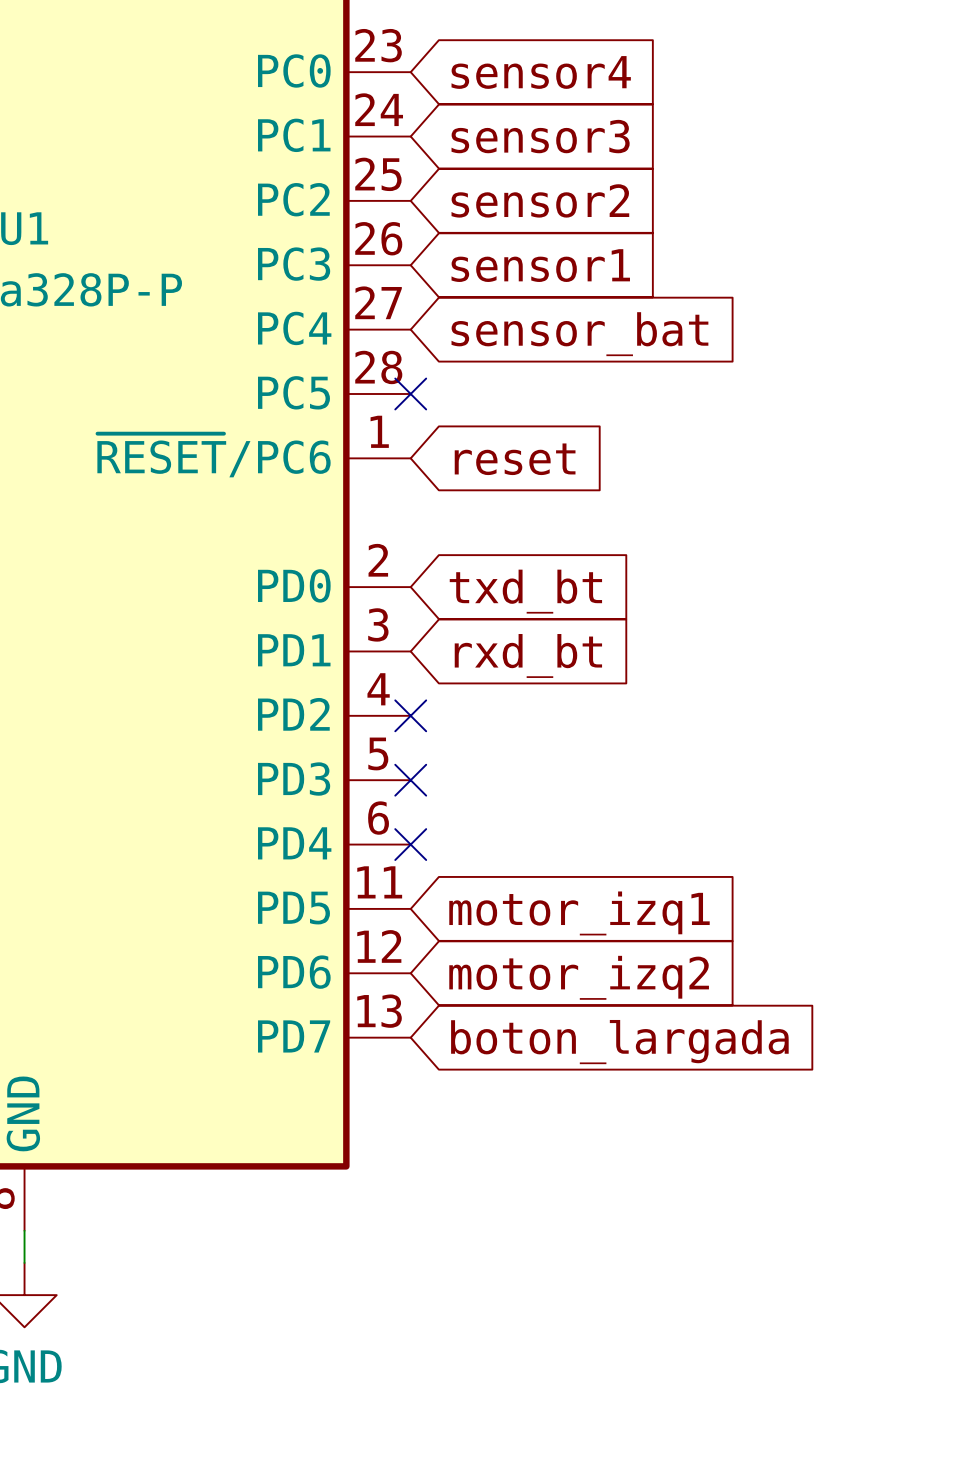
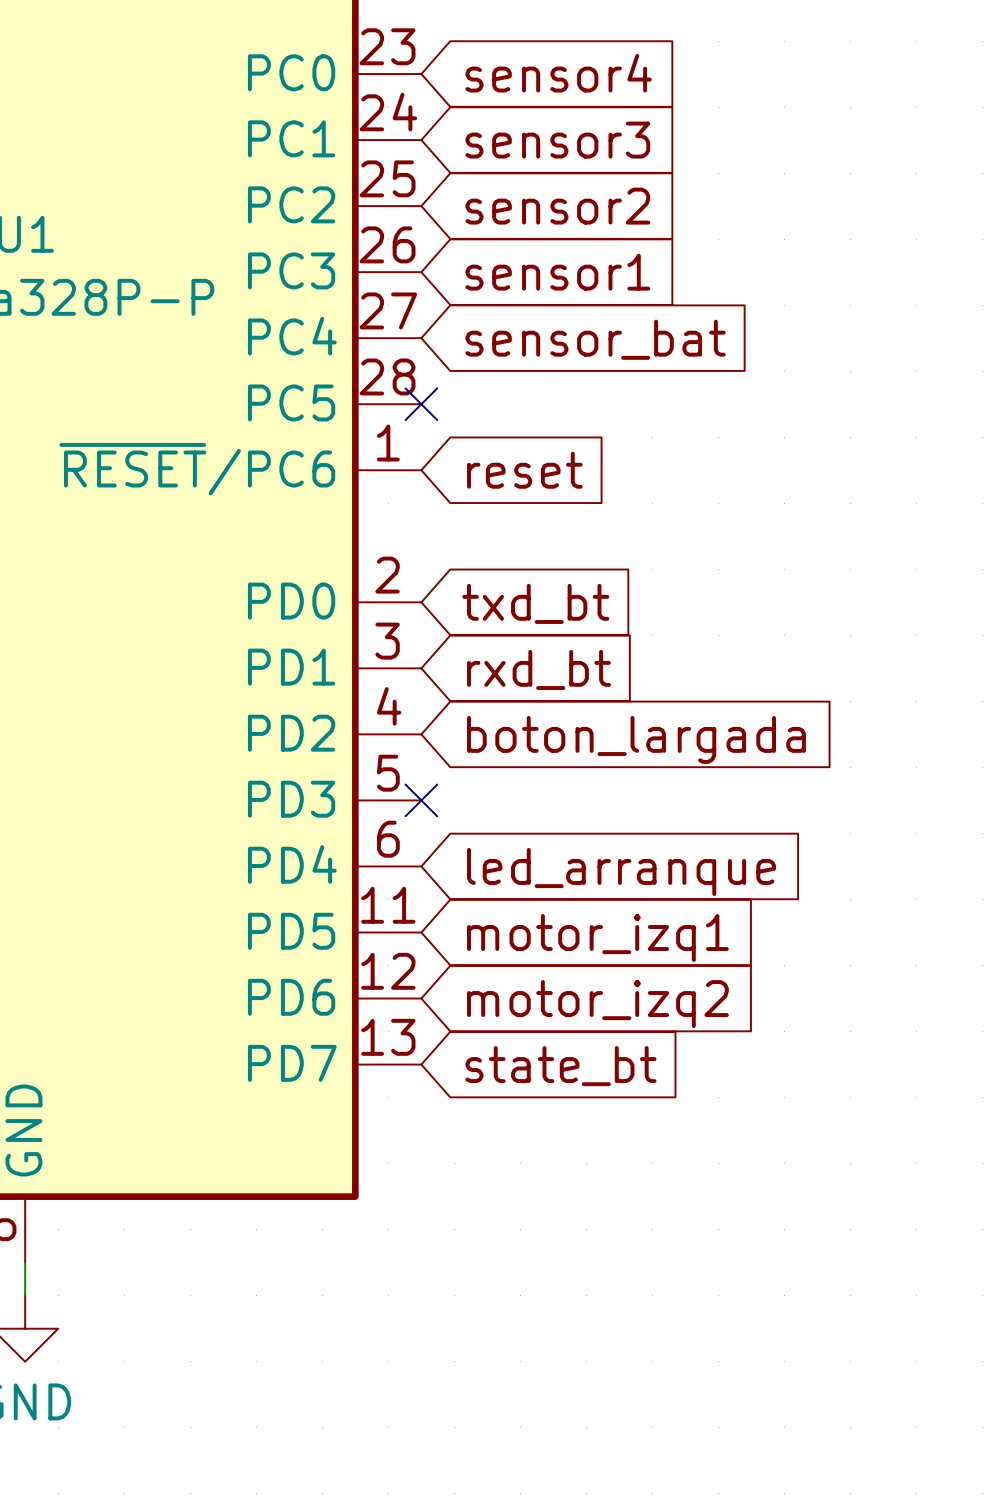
no-connect mark: (410, 715) -> none
global label: none -> boton_largada (636, 739)
no-connect mark: (410, 844) -> none
global label: none -> led_arranque (621, 871)
global label: boton_largada (619, 1042) -> state_bt (560, 1066)

